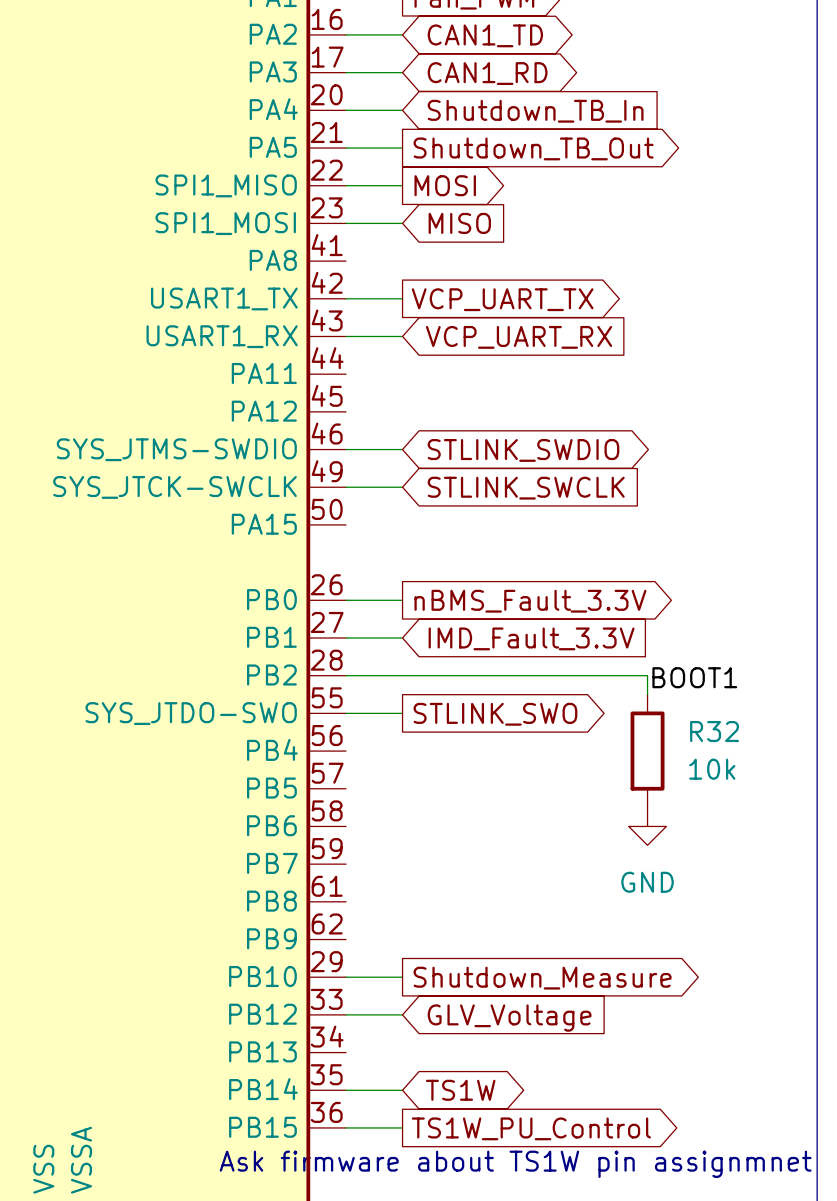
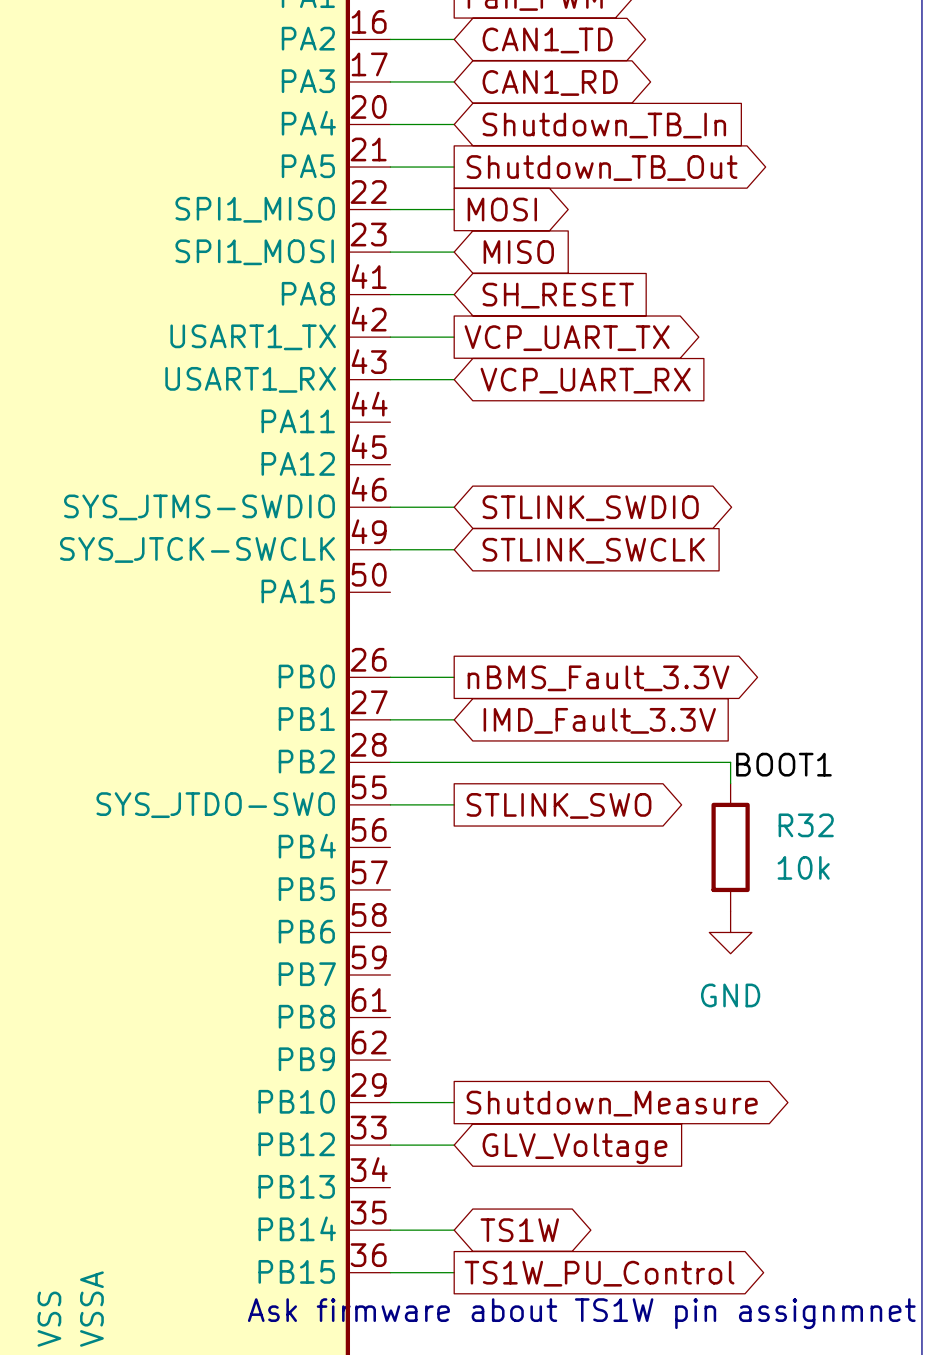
wire: none -> (390, 294) (454, 294)
global label: none -> SH_RESET (558, 295)

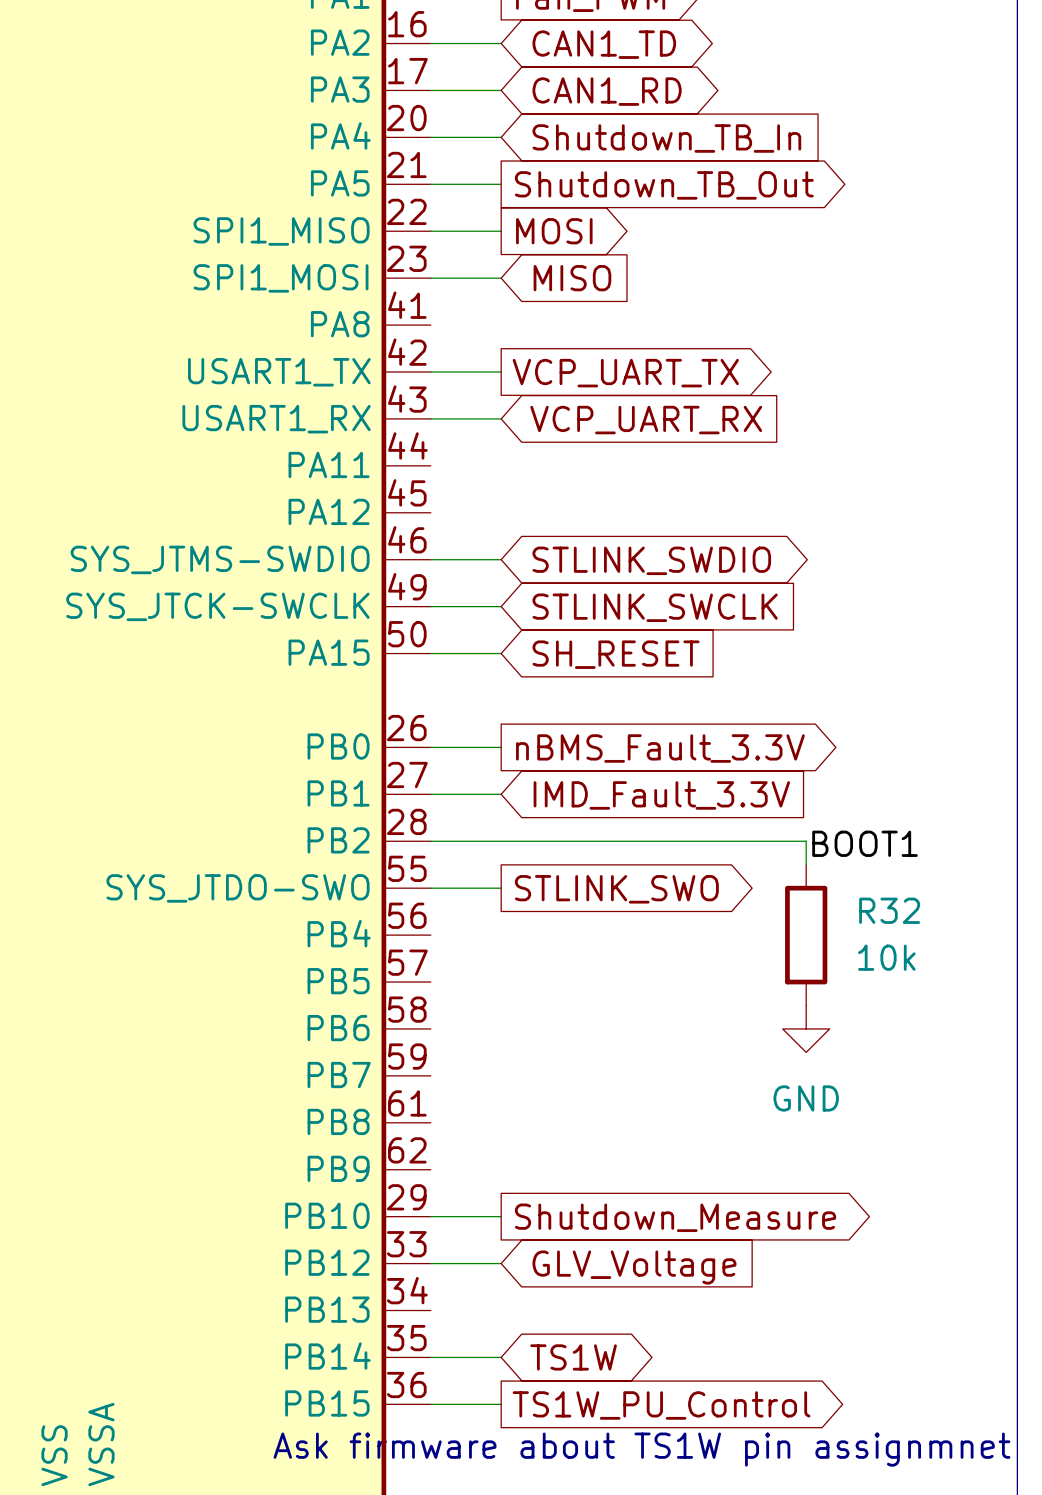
wire: (390, 294) (454, 294) -> (430, 653) (501, 653)
global label position: SH_RESET (558, 295) -> SH_RESET (616, 654)

